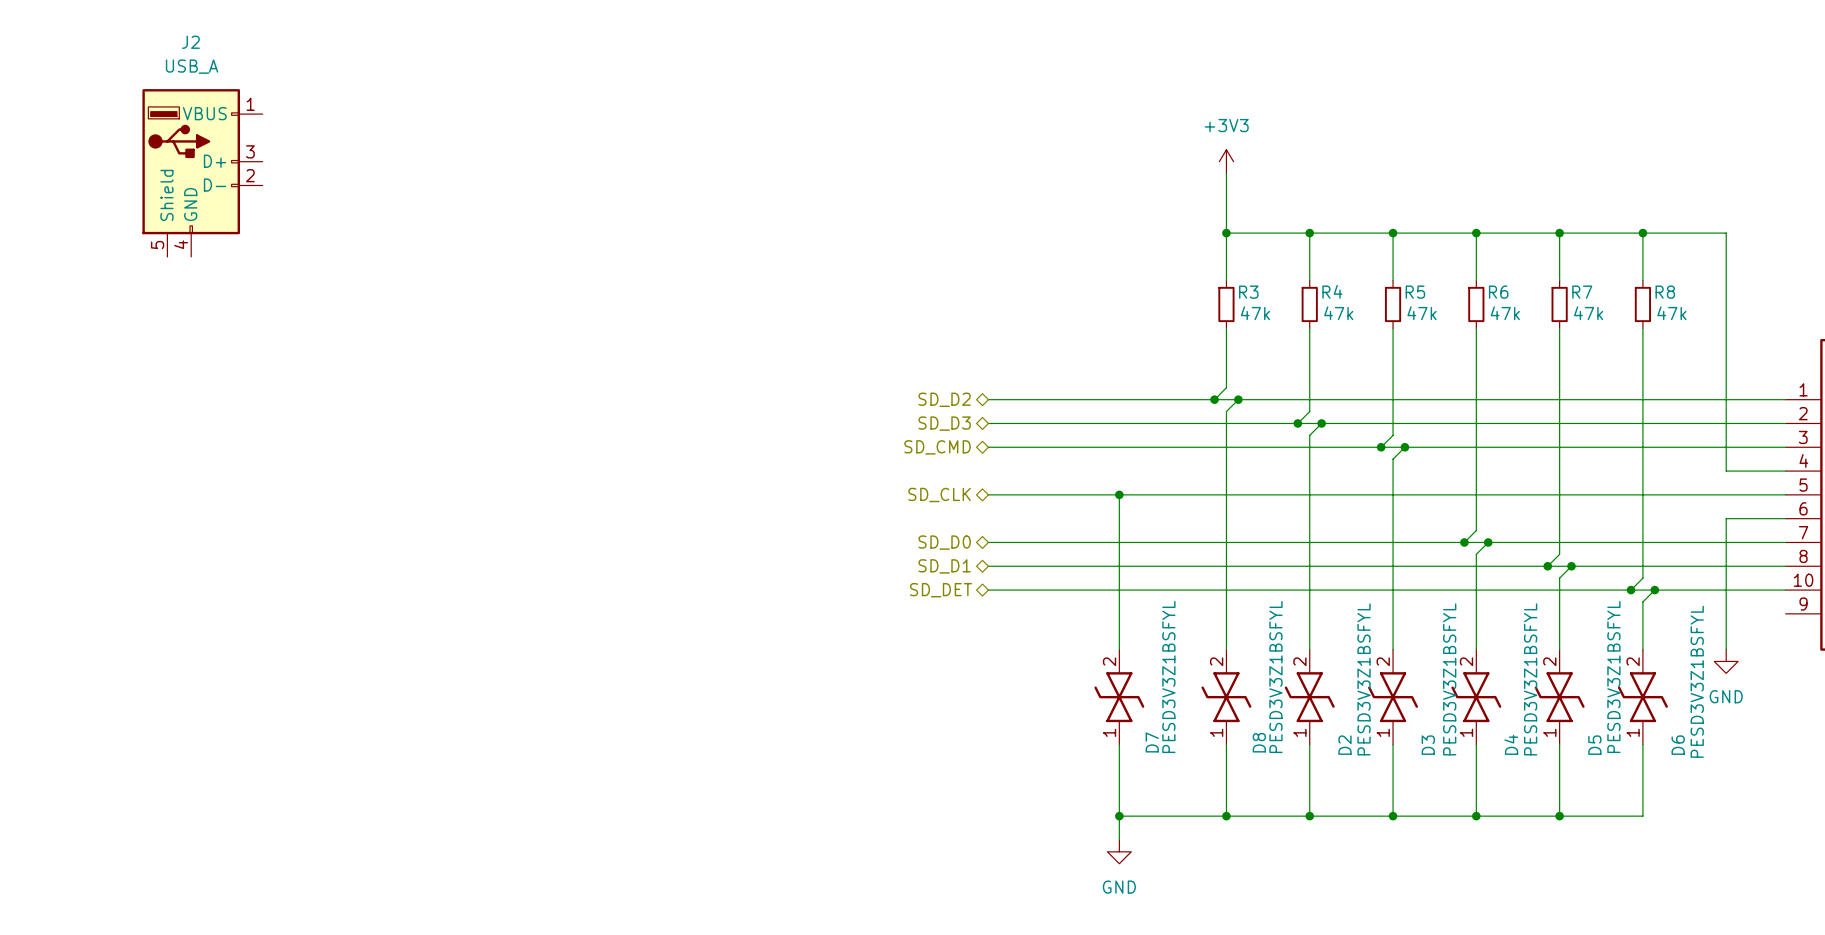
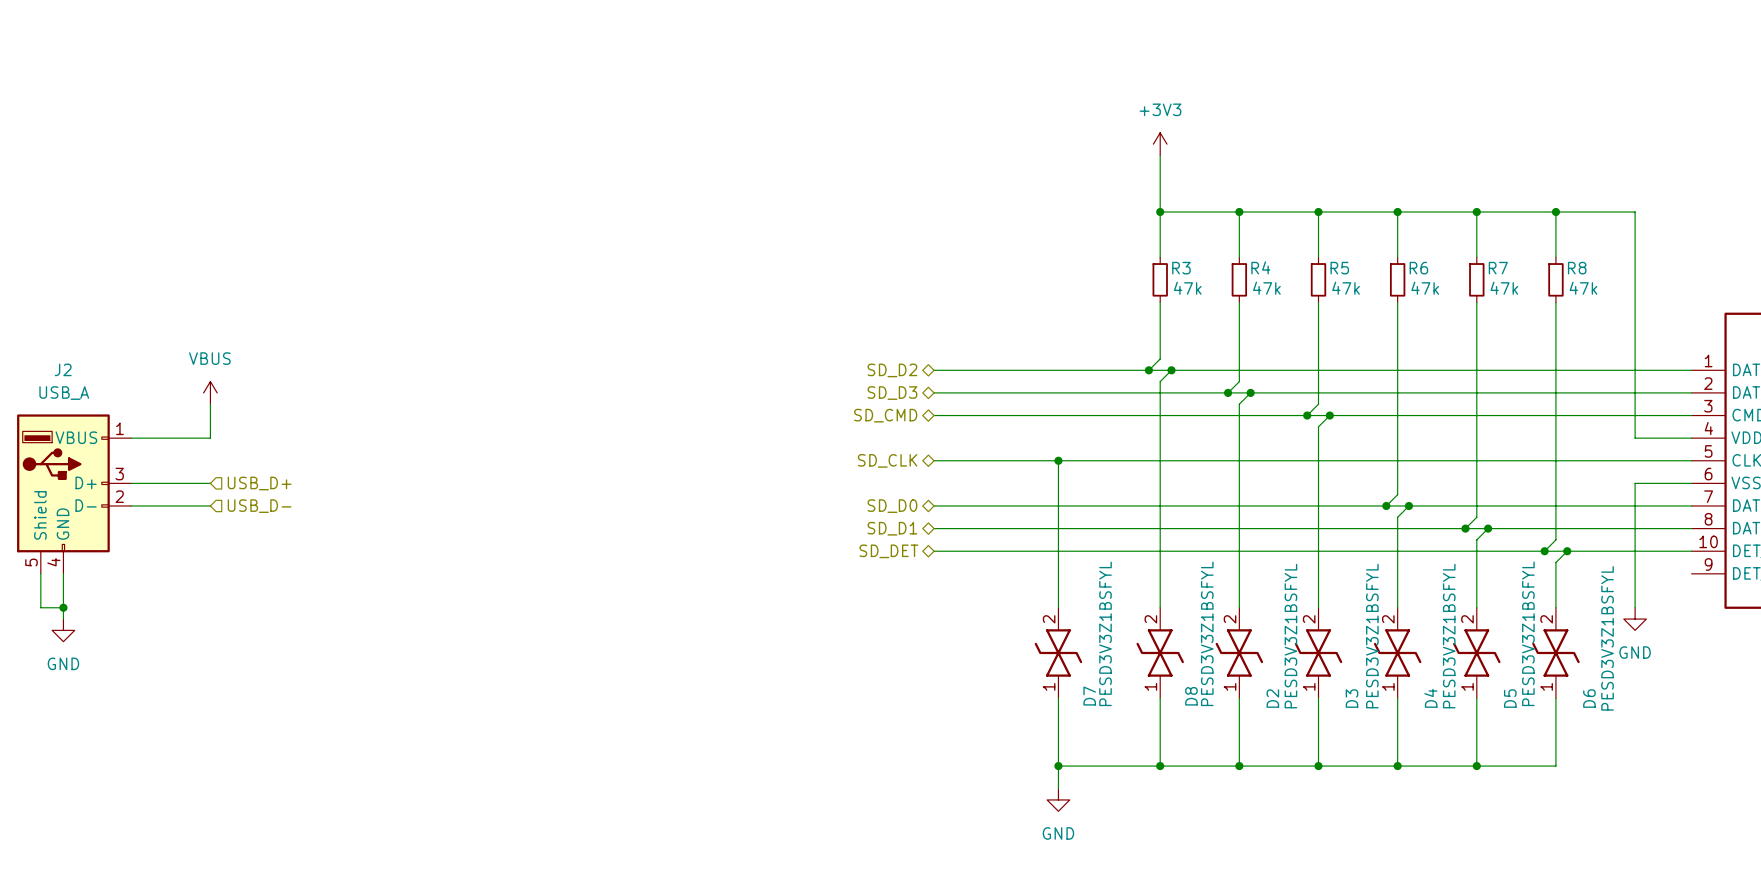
J2 position: (202, 172) -> (74, 494)
power symbol: none -> VBUS (210, 392)
wire: none -> (210, 404) (210, 438) (131, 438)
wire: none -> (131, 483) (210, 483)
hierarchical label: none -> USB_D+ (259, 483)
wire: none -> (131, 505) (210, 505)
hierarchical label: none -> USB_D- (259, 506)
wire: none -> (40, 573) (40, 607) (63, 607)
wire: none -> (63, 573) (63, 619)
junction: none -> (63, 607)
power symbol: none -> GND (63, 630)

